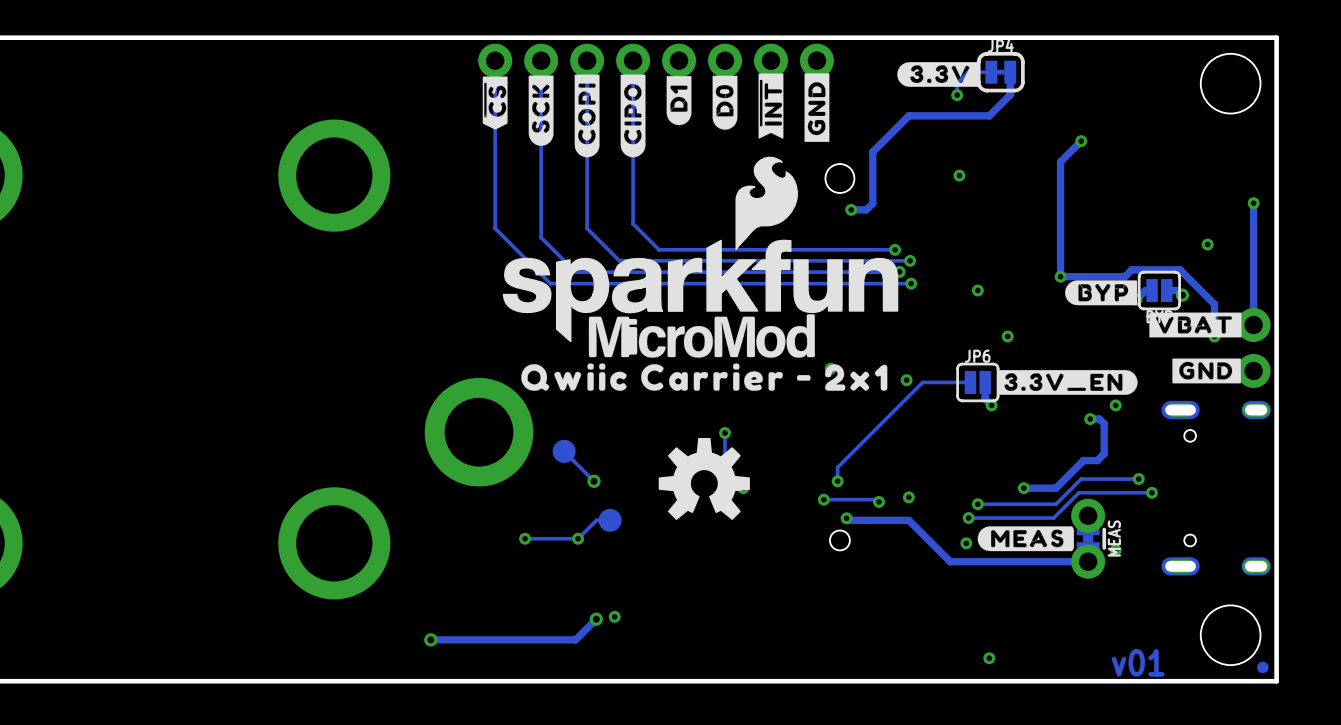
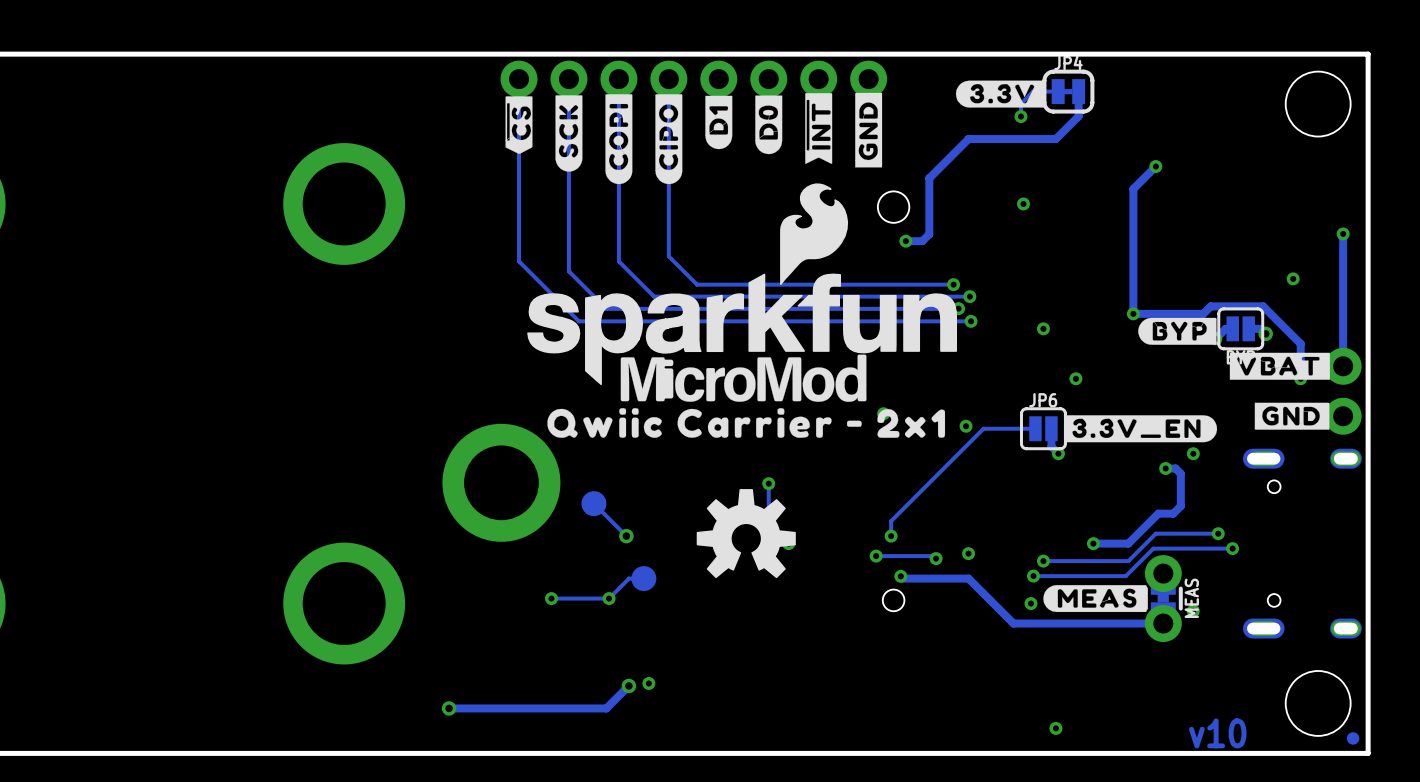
text: v01 (1138, 662) -> v10 (1217, 733)

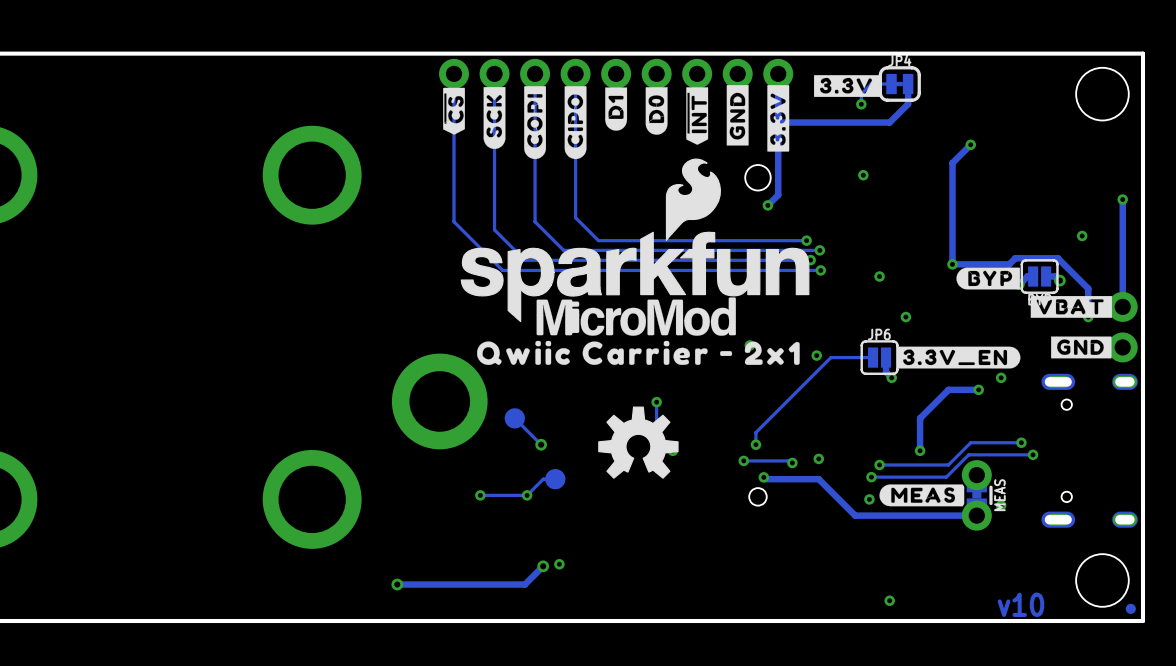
part: (693, 79) -> none
part: none -> (616, 73)
drawing shape: [955, 80, 1045, 108] -> [813, 75, 881, 97]
drawing: none -> [767, 85, 790, 152]
drawing shape: [805, 93, 833, 164] -> [686, 87, 709, 145]
track: (968, 139) (929, 178) (929, 234) (922, 241) (905, 241) -> (778, 73) (778, 195) (767, 205)
track: none -> (818, 122) (778, 122)
track: (1165, 468) (1175, 468) (1180, 473) (1180, 506) (1173, 513) (1158, 513) (1128, 543) (1093, 543) -> (978, 389) (948, 389) (920, 418) (920, 450)

